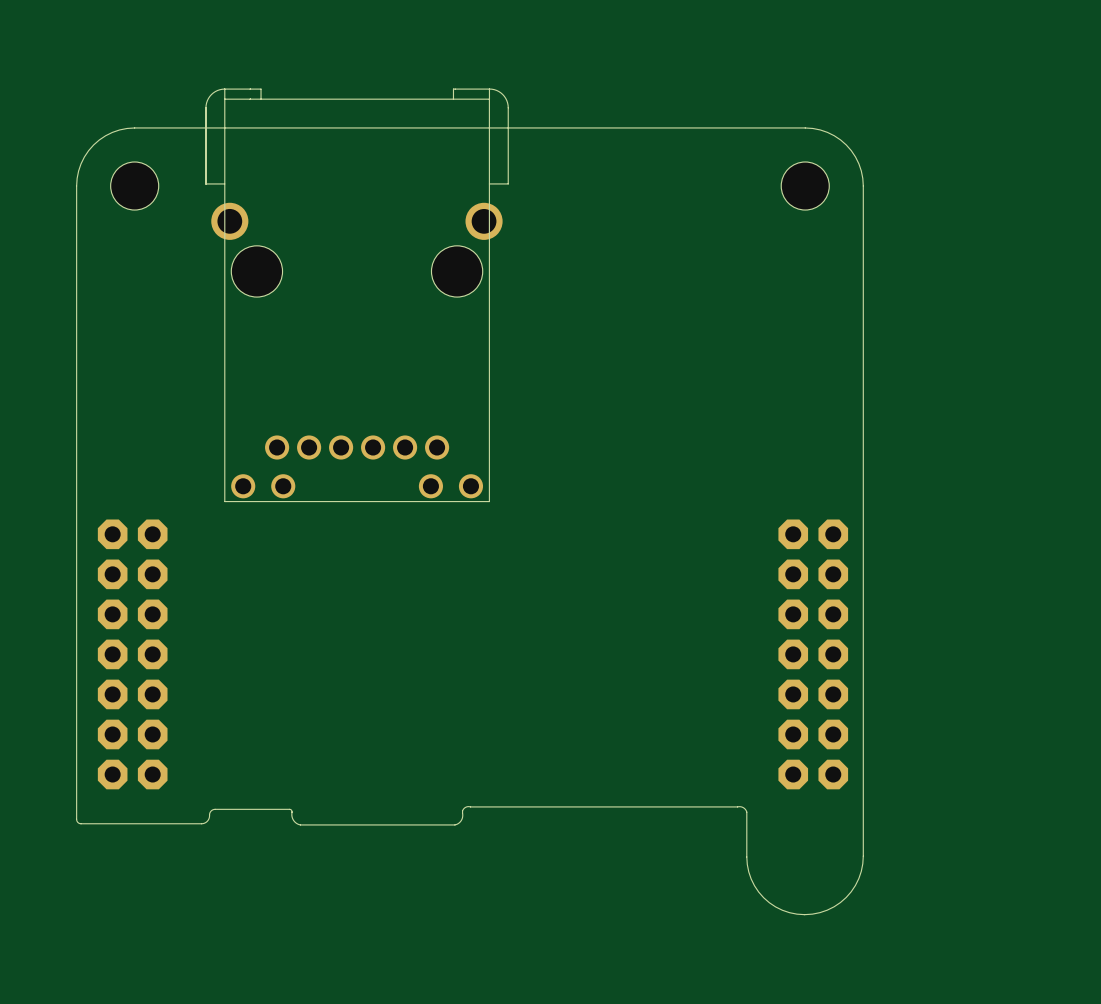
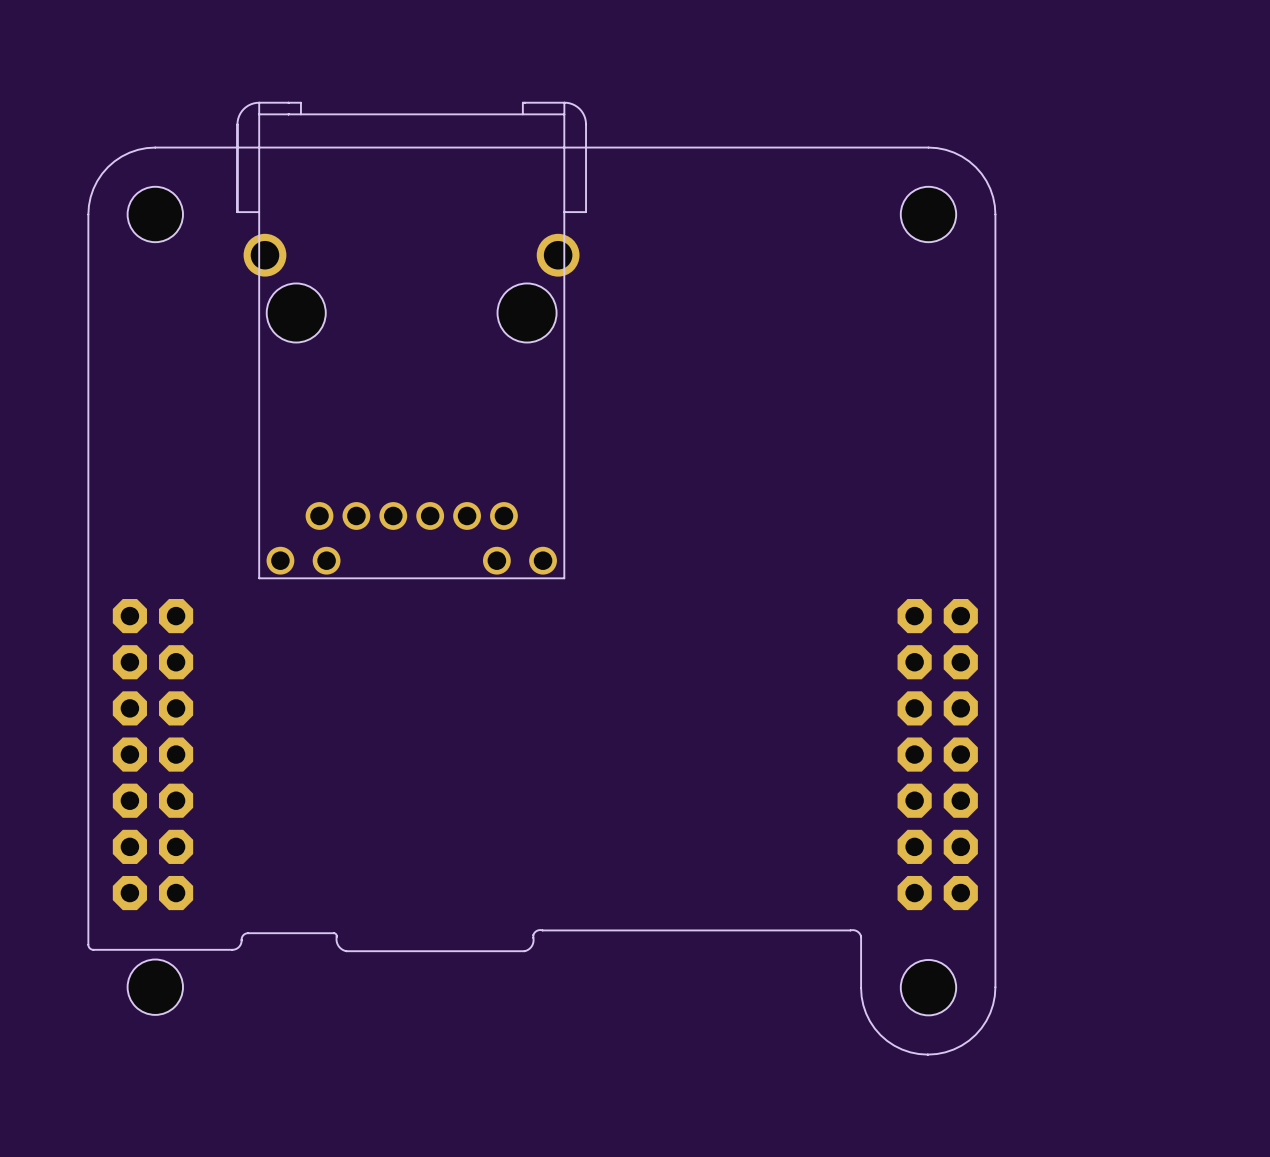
part: none -> (155, 987)
part: none -> (928, 987)

